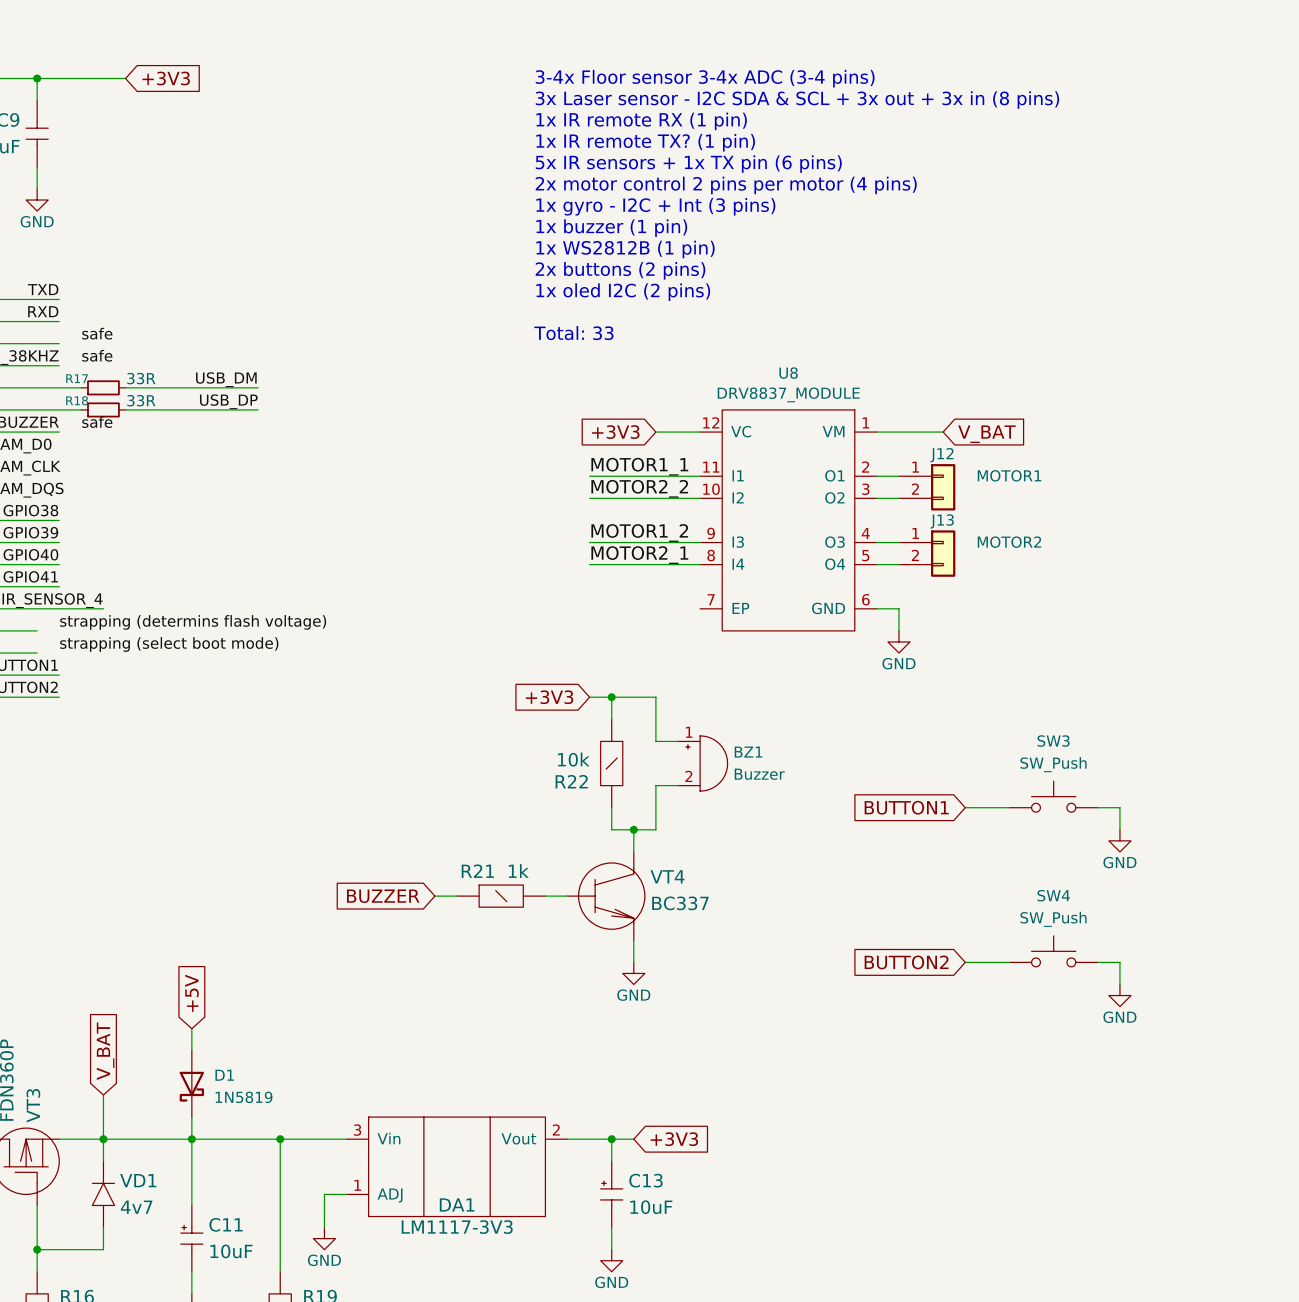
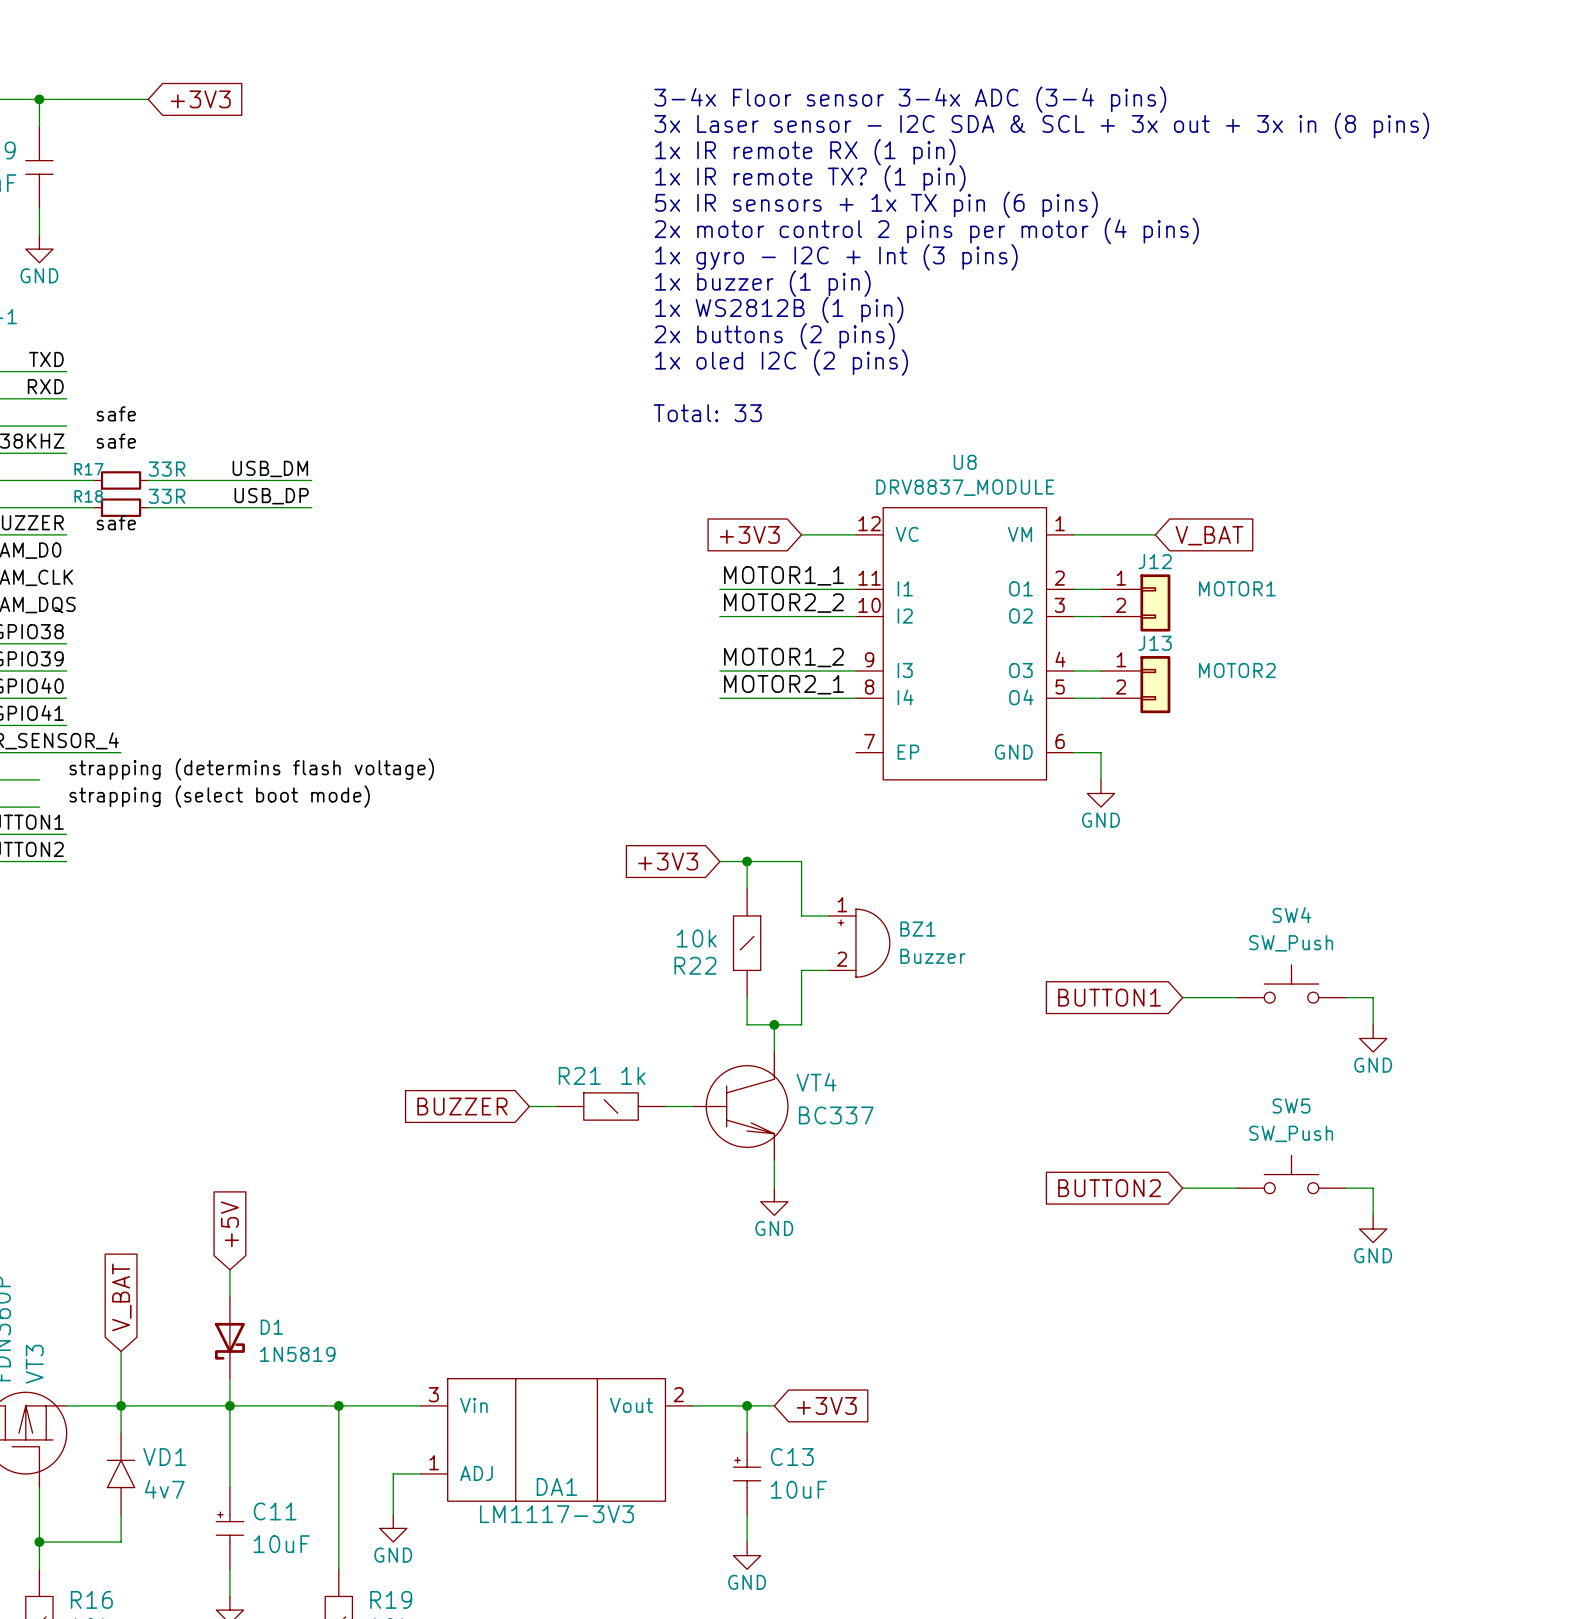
SW3 name: SW3 (1053, 741) -> SW4 (1291, 915)
SW4 name: SW4 (1053, 895) -> SW5 (1291, 1106)

